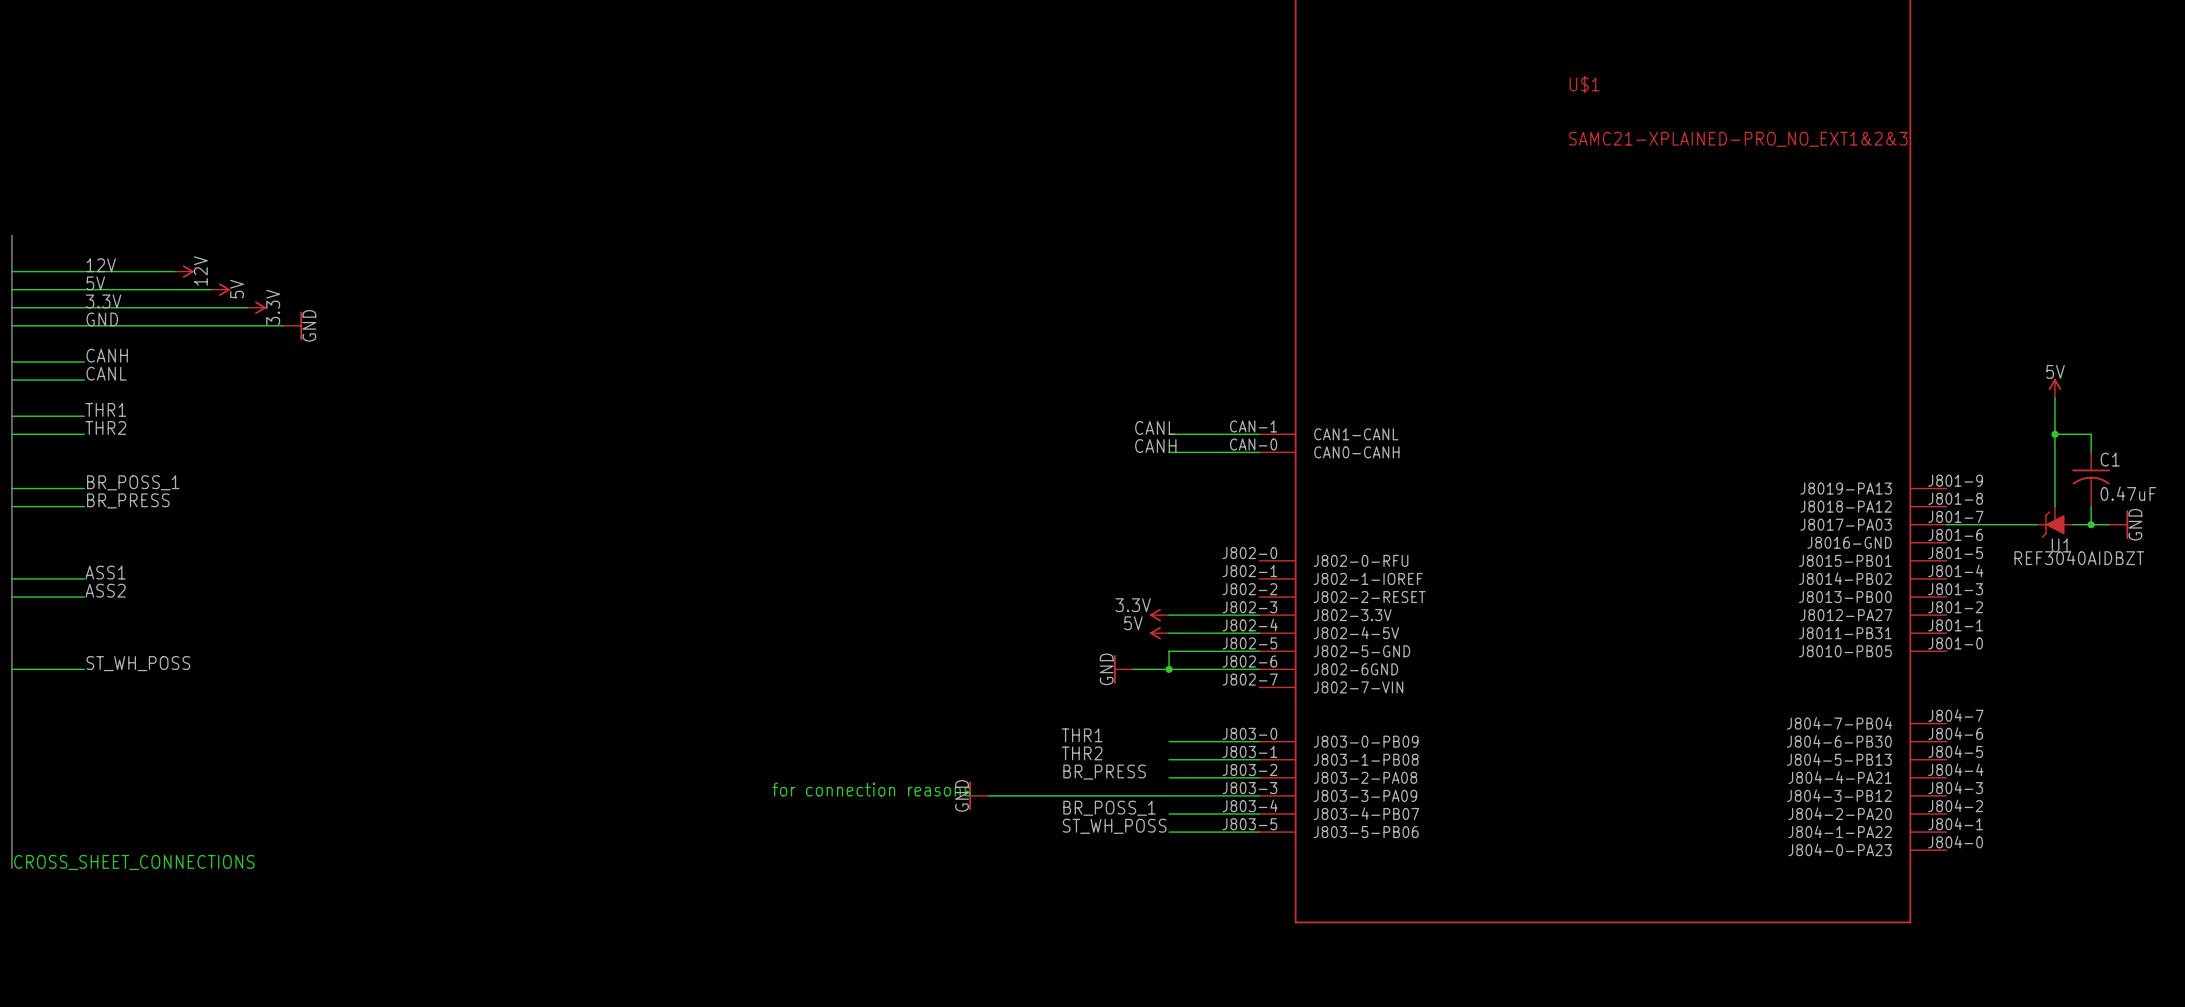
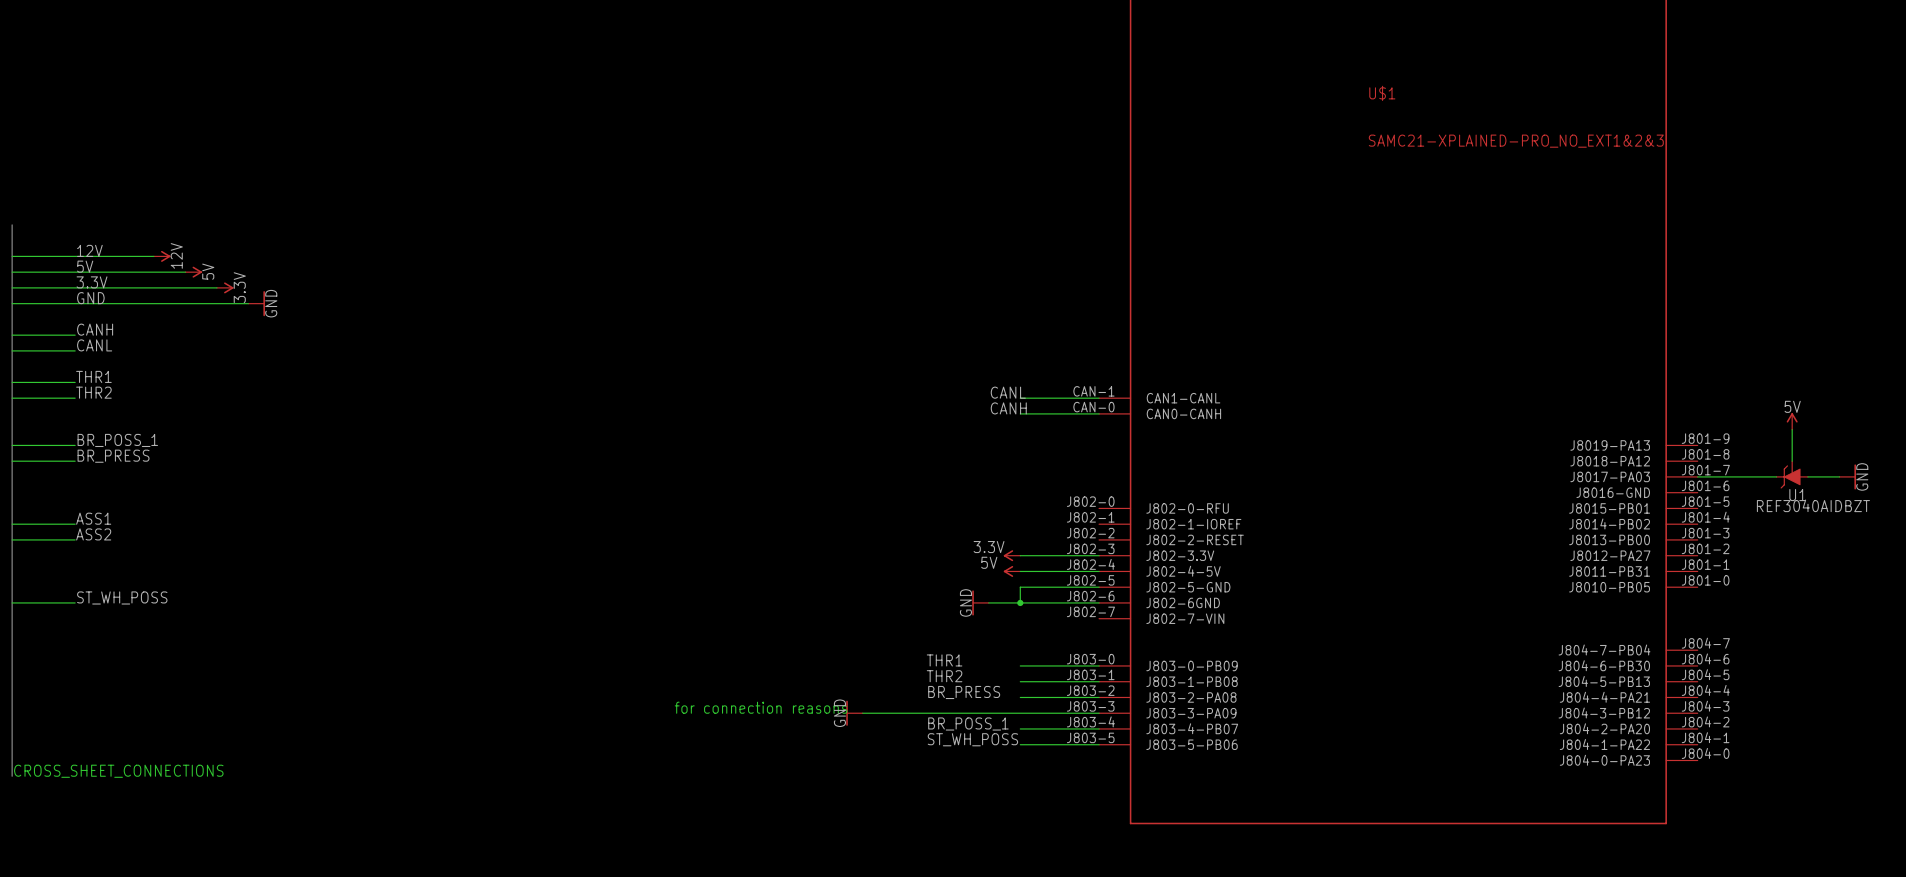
power symbol position: 5V (2054, 388) -> 5V (1792, 421)
wire: (2054, 398) (2054, 470) -> none
wire: (2054, 434) (2091, 434) (2091, 452) -> none
junction: (2054, 434) -> none
C1: 0.47uF (2091, 479) -> none
wire: (2091, 506) (2091, 524) -> none
junction: (2091, 524) -> none

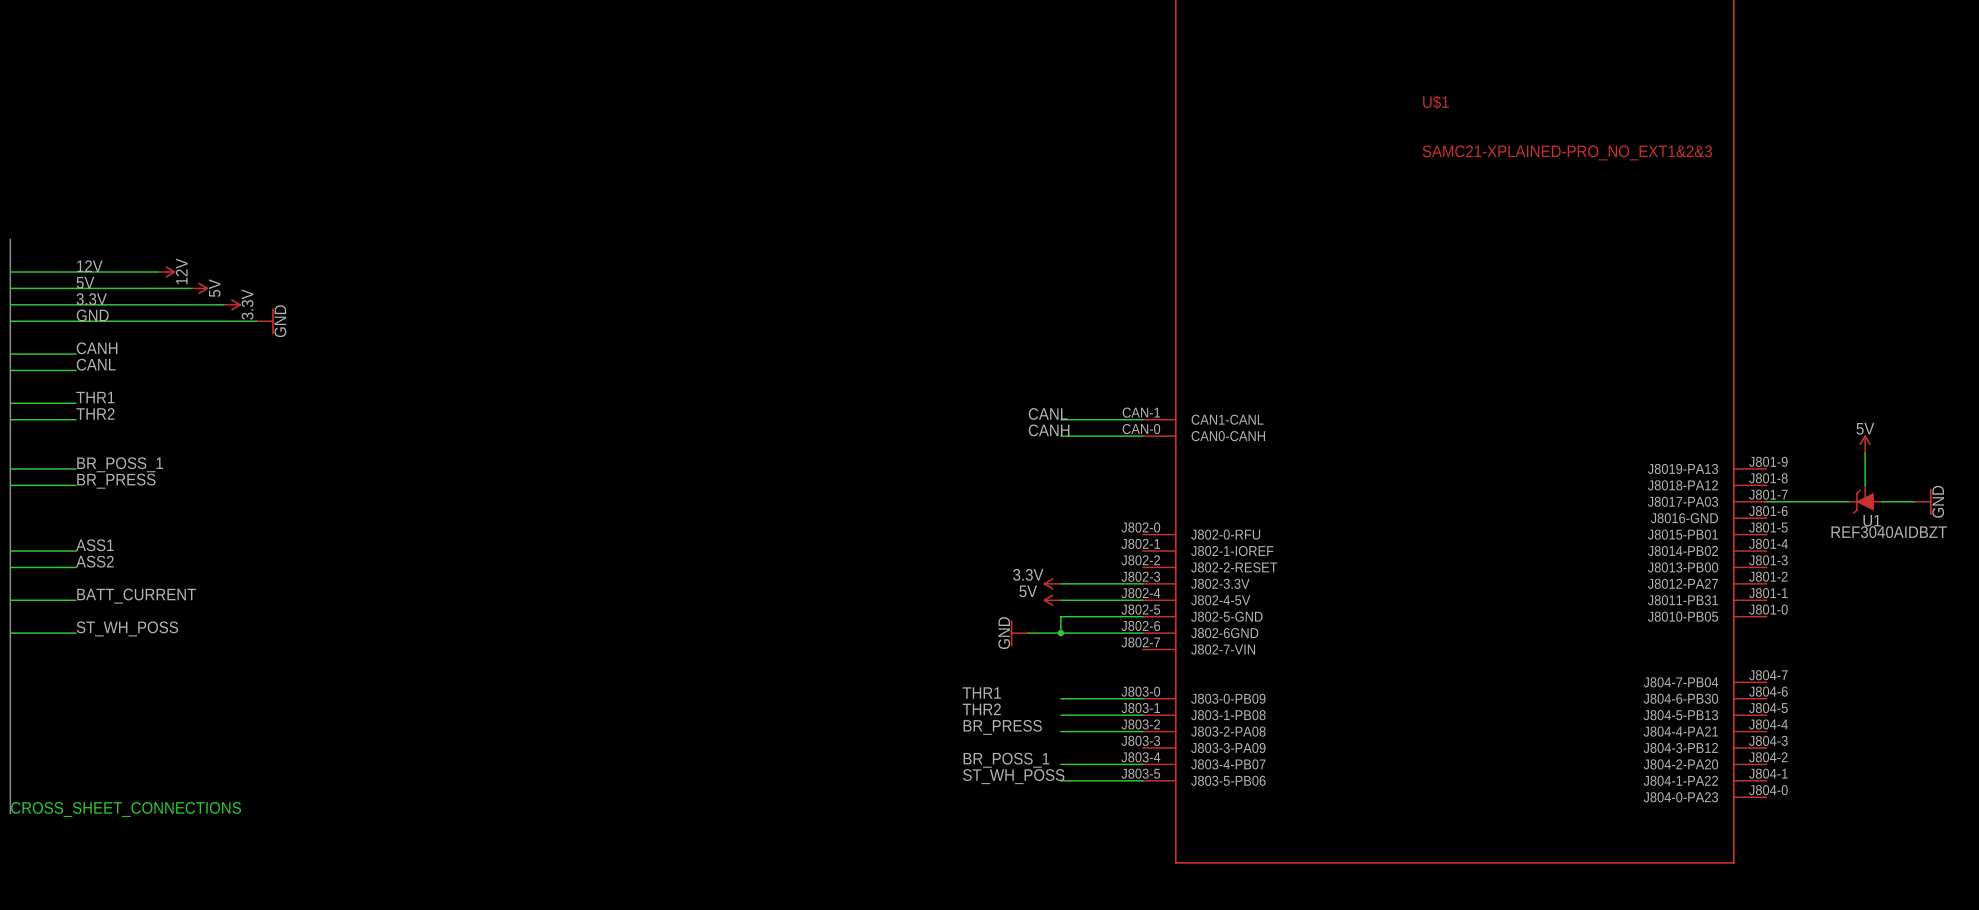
label: none -> BATT_CURRENT (136, 596)
wire: none -> (10, 600) (76, 600)
text: for connection reasons (761, 707) -> none
power symbol: GND (854, 713) -> none
wire: (862, 713) (1099, 713) -> none

